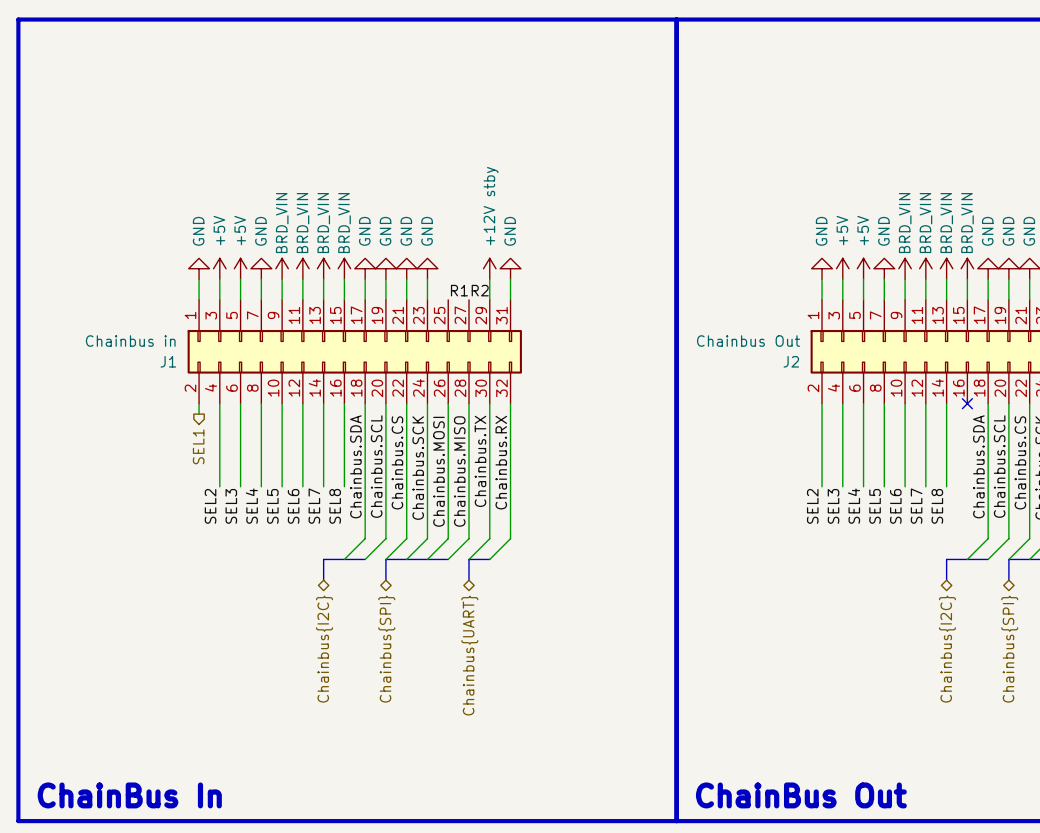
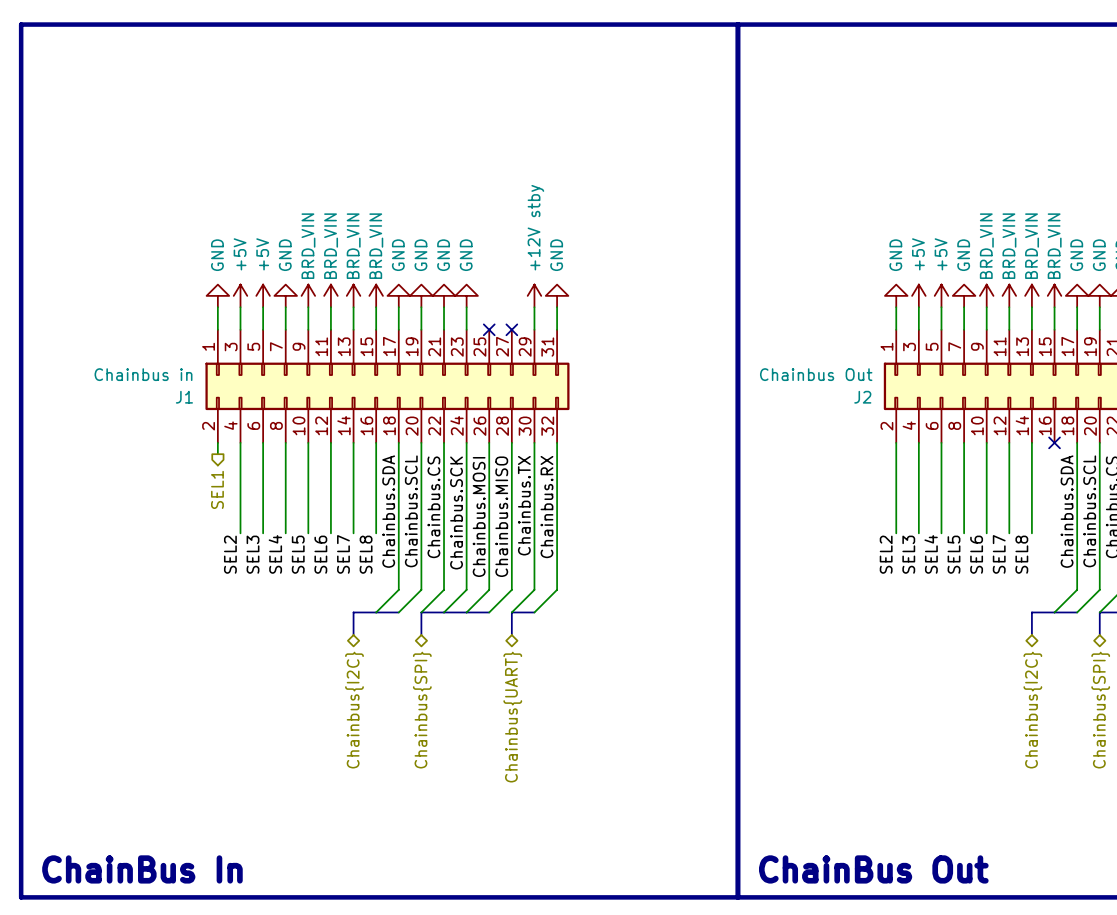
label: R1 (459, 290) -> none
label: R2 (480, 290) -> none
no-connect mark: none -> (489, 329)
no-connect mark: none -> (511, 329)

